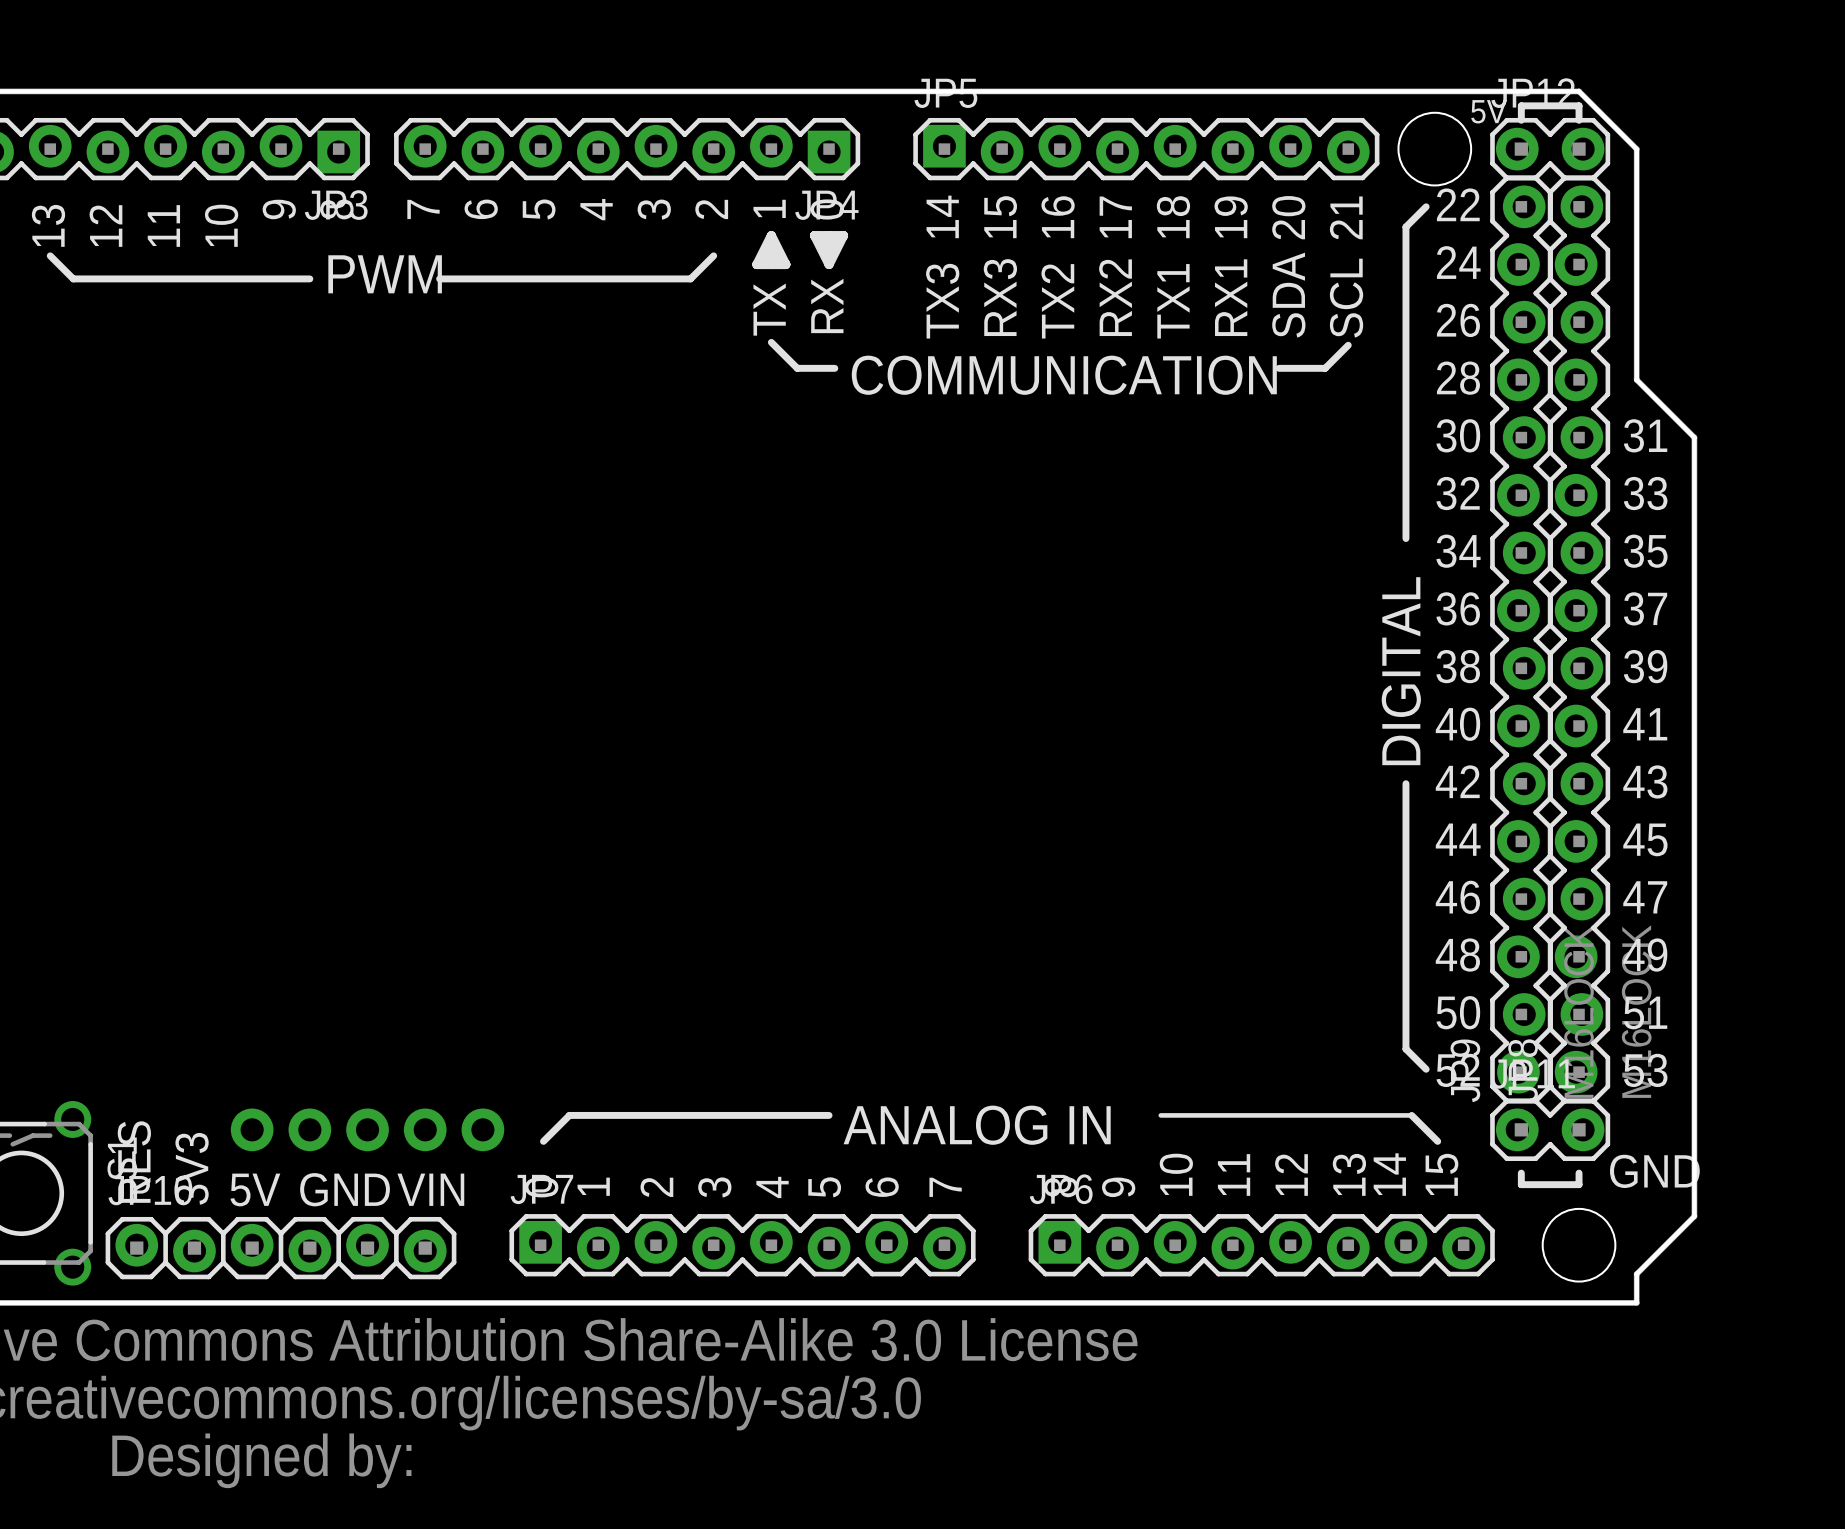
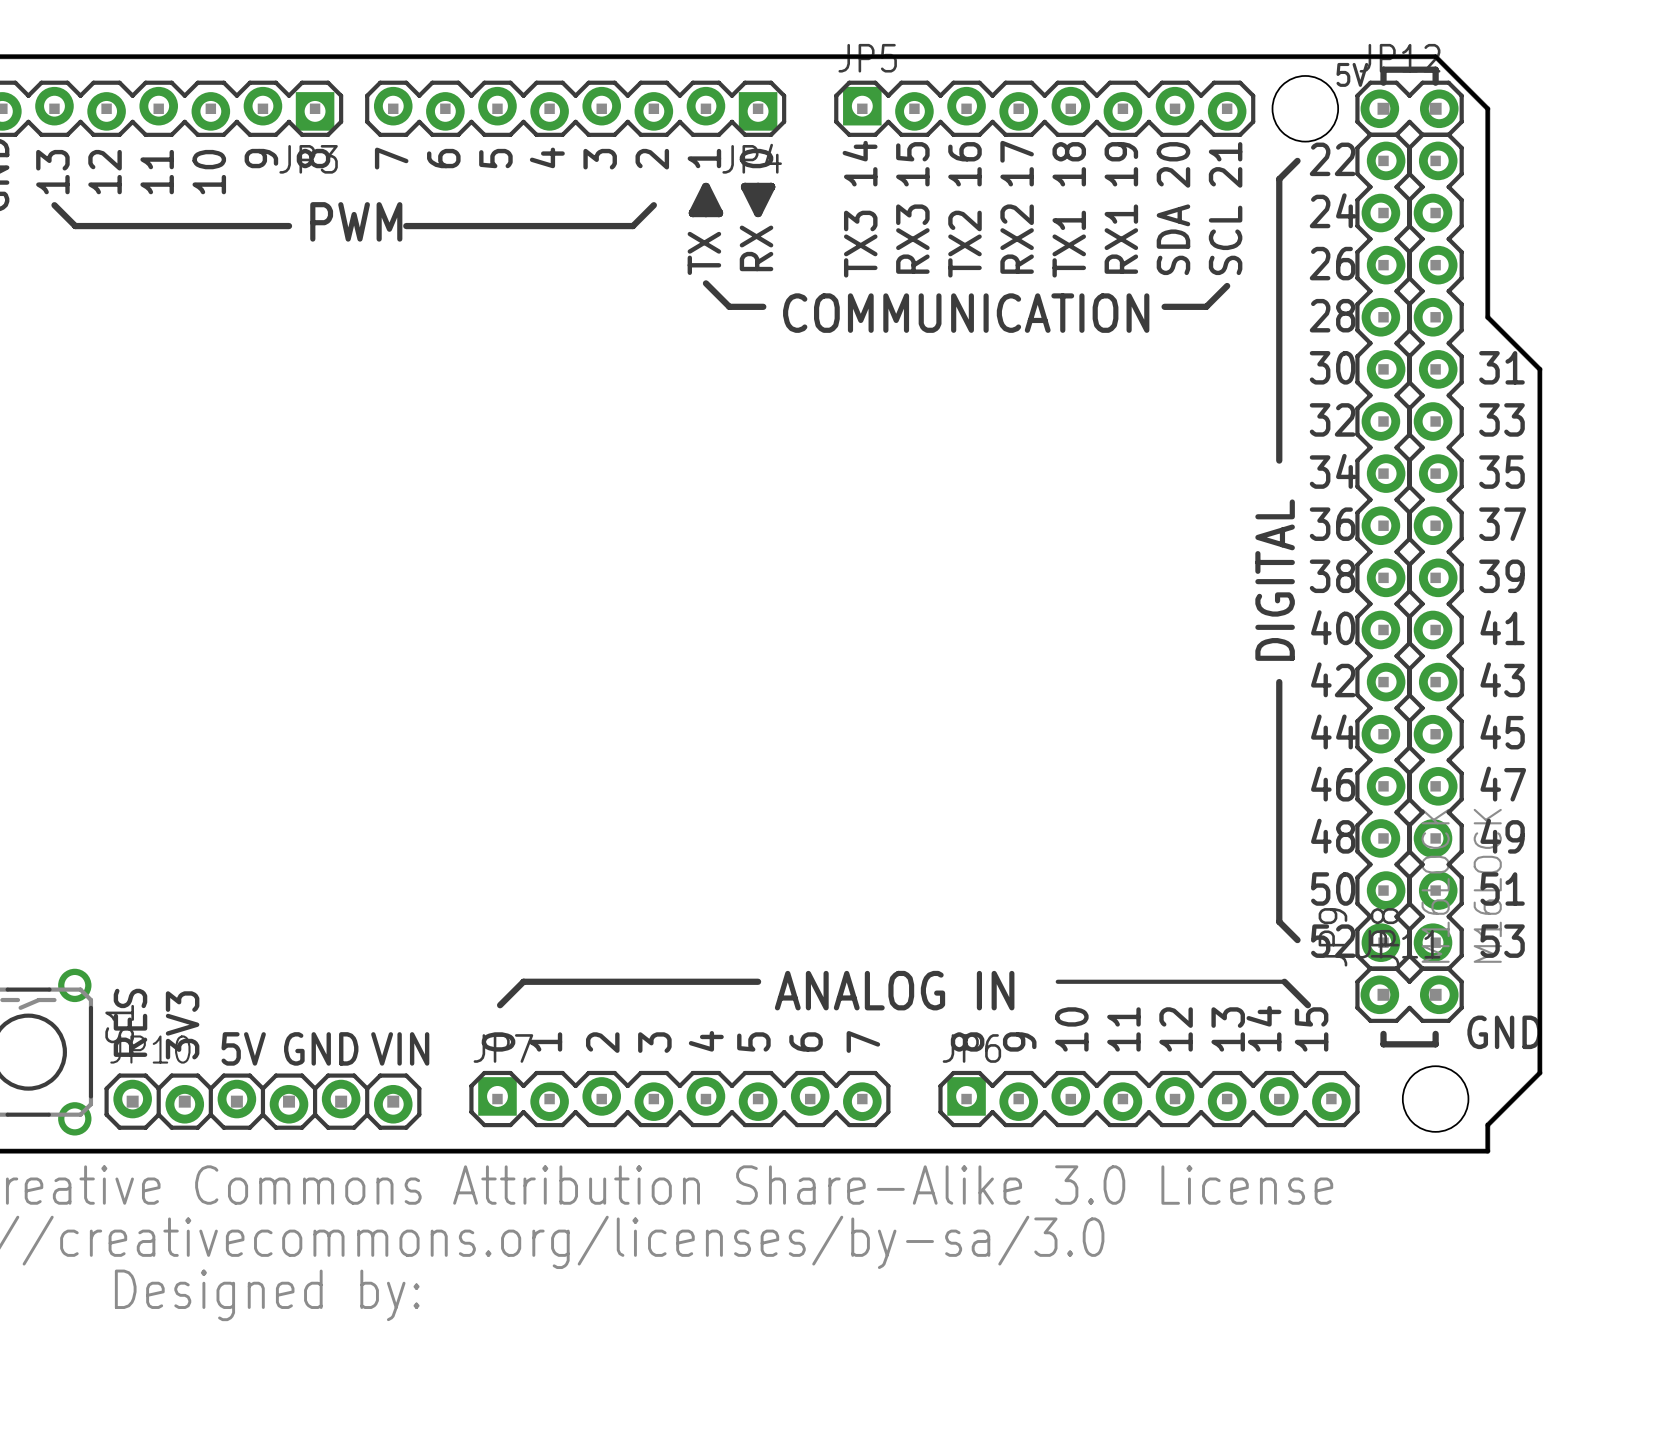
via: (252, 1129) -> none
via: (309, 1129) -> none
via: (367, 1129) -> none
via: (425, 1129) -> none
via: (482, 1129) -> none

